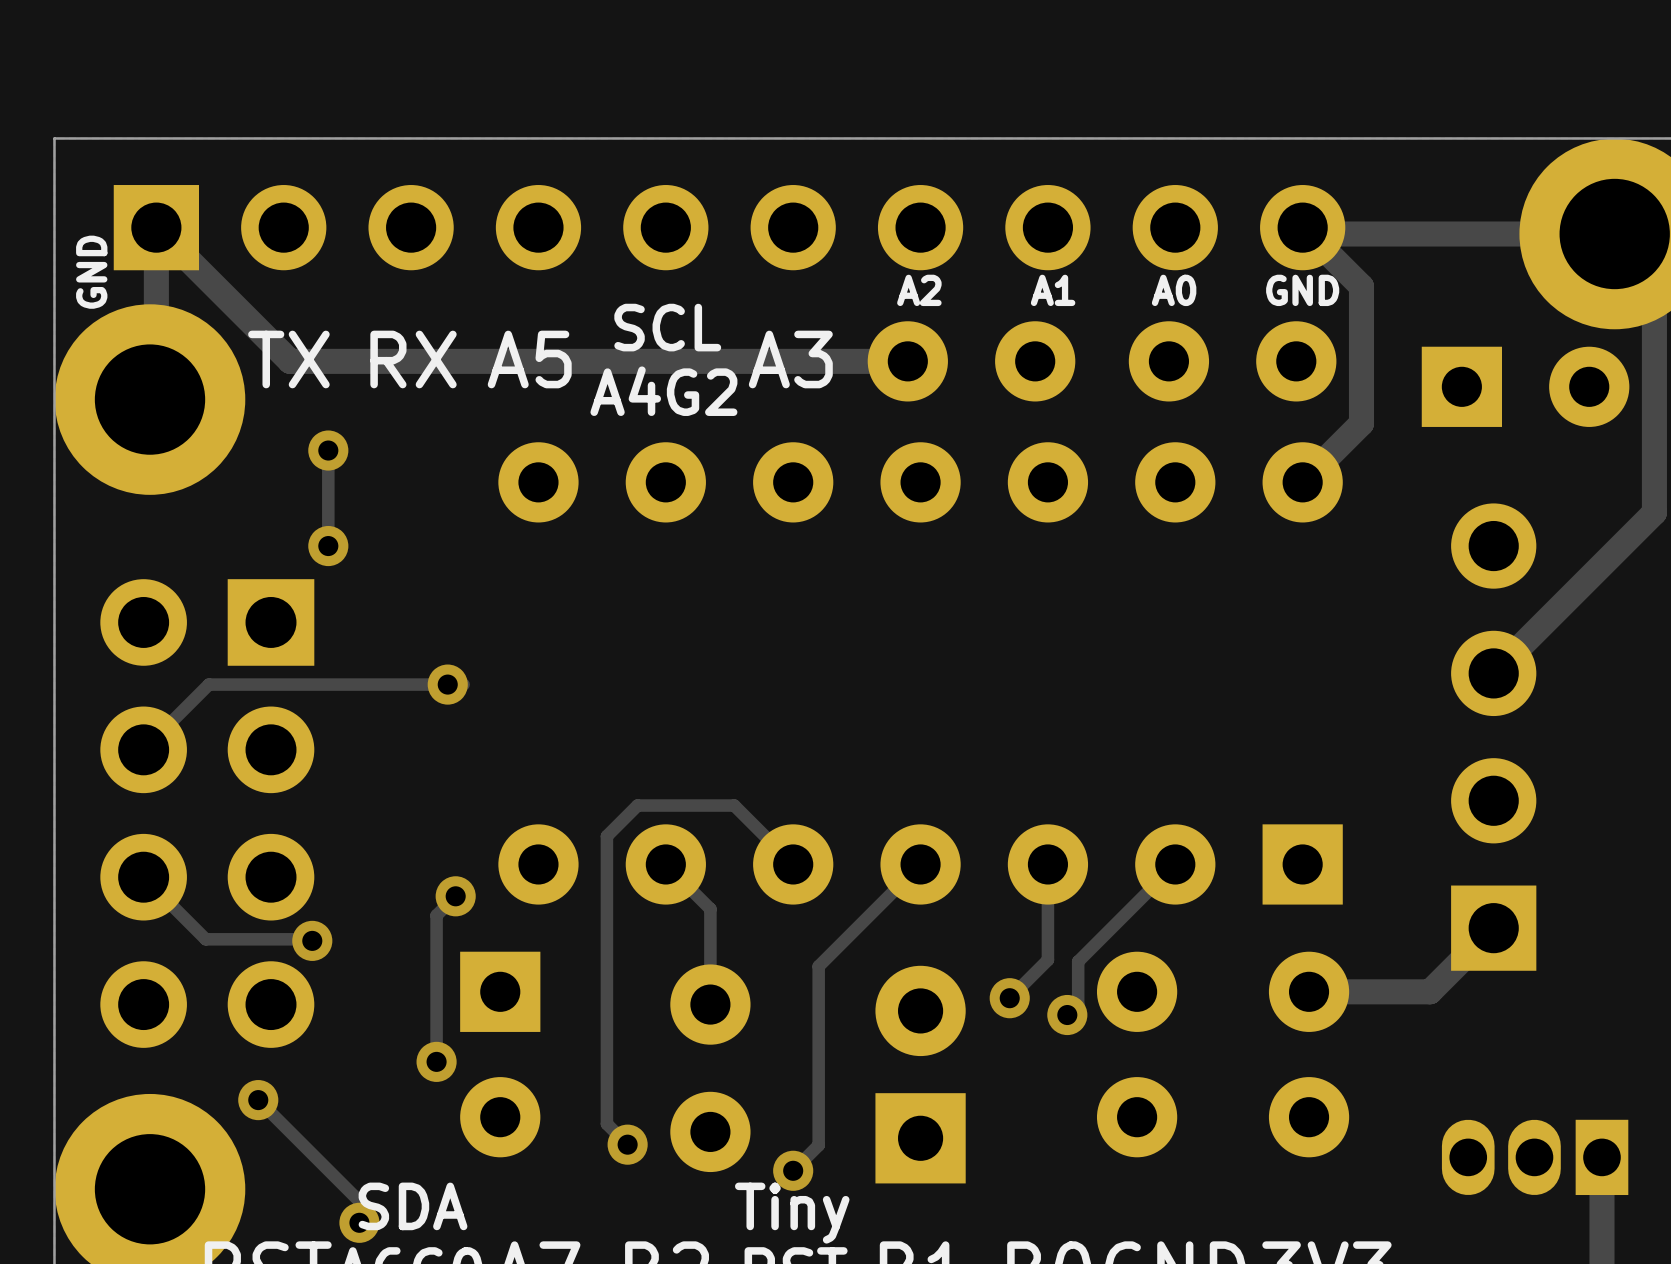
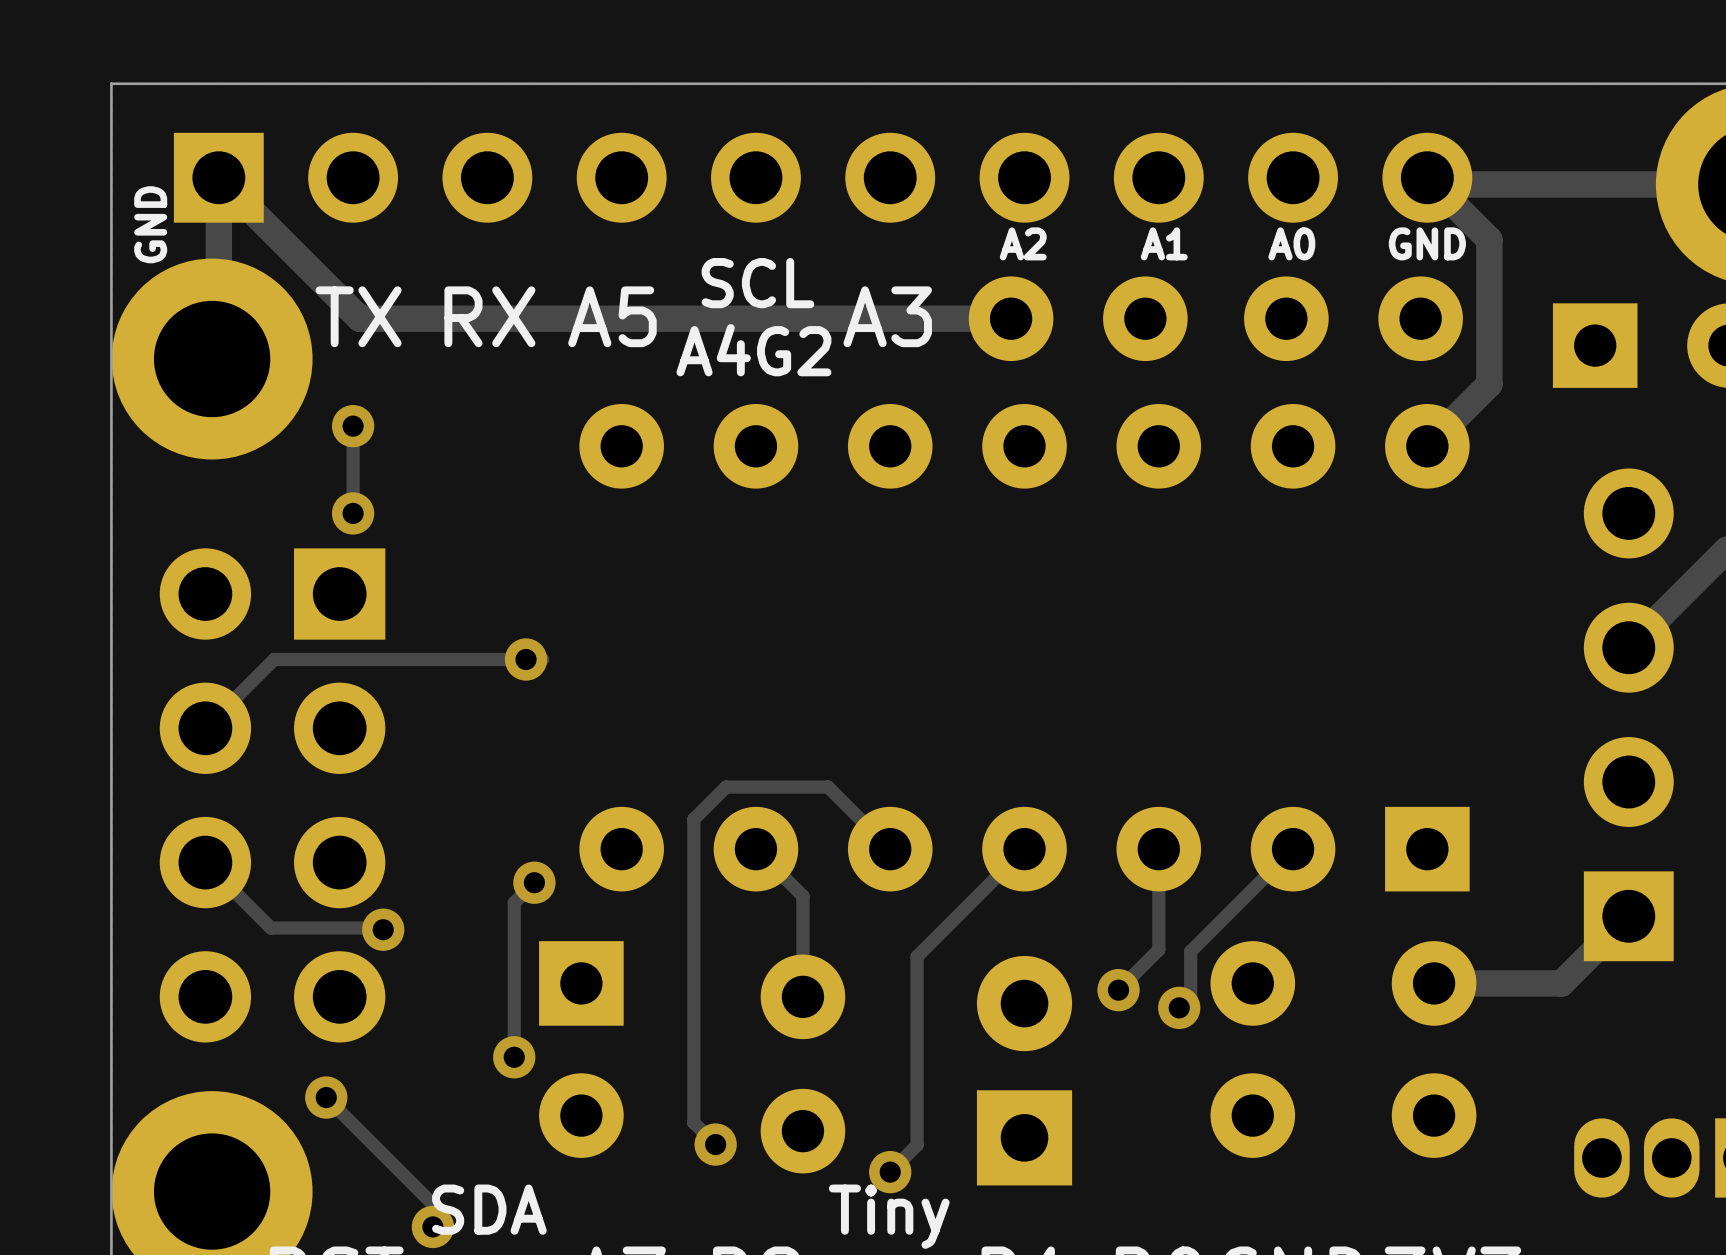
track: (328, 450) (328, 546) -> none
via position: (328, 450) -> (353, 426)
track: none -> (353, 426) (353, 513)
via position: (328, 546) -> (353, 513)

